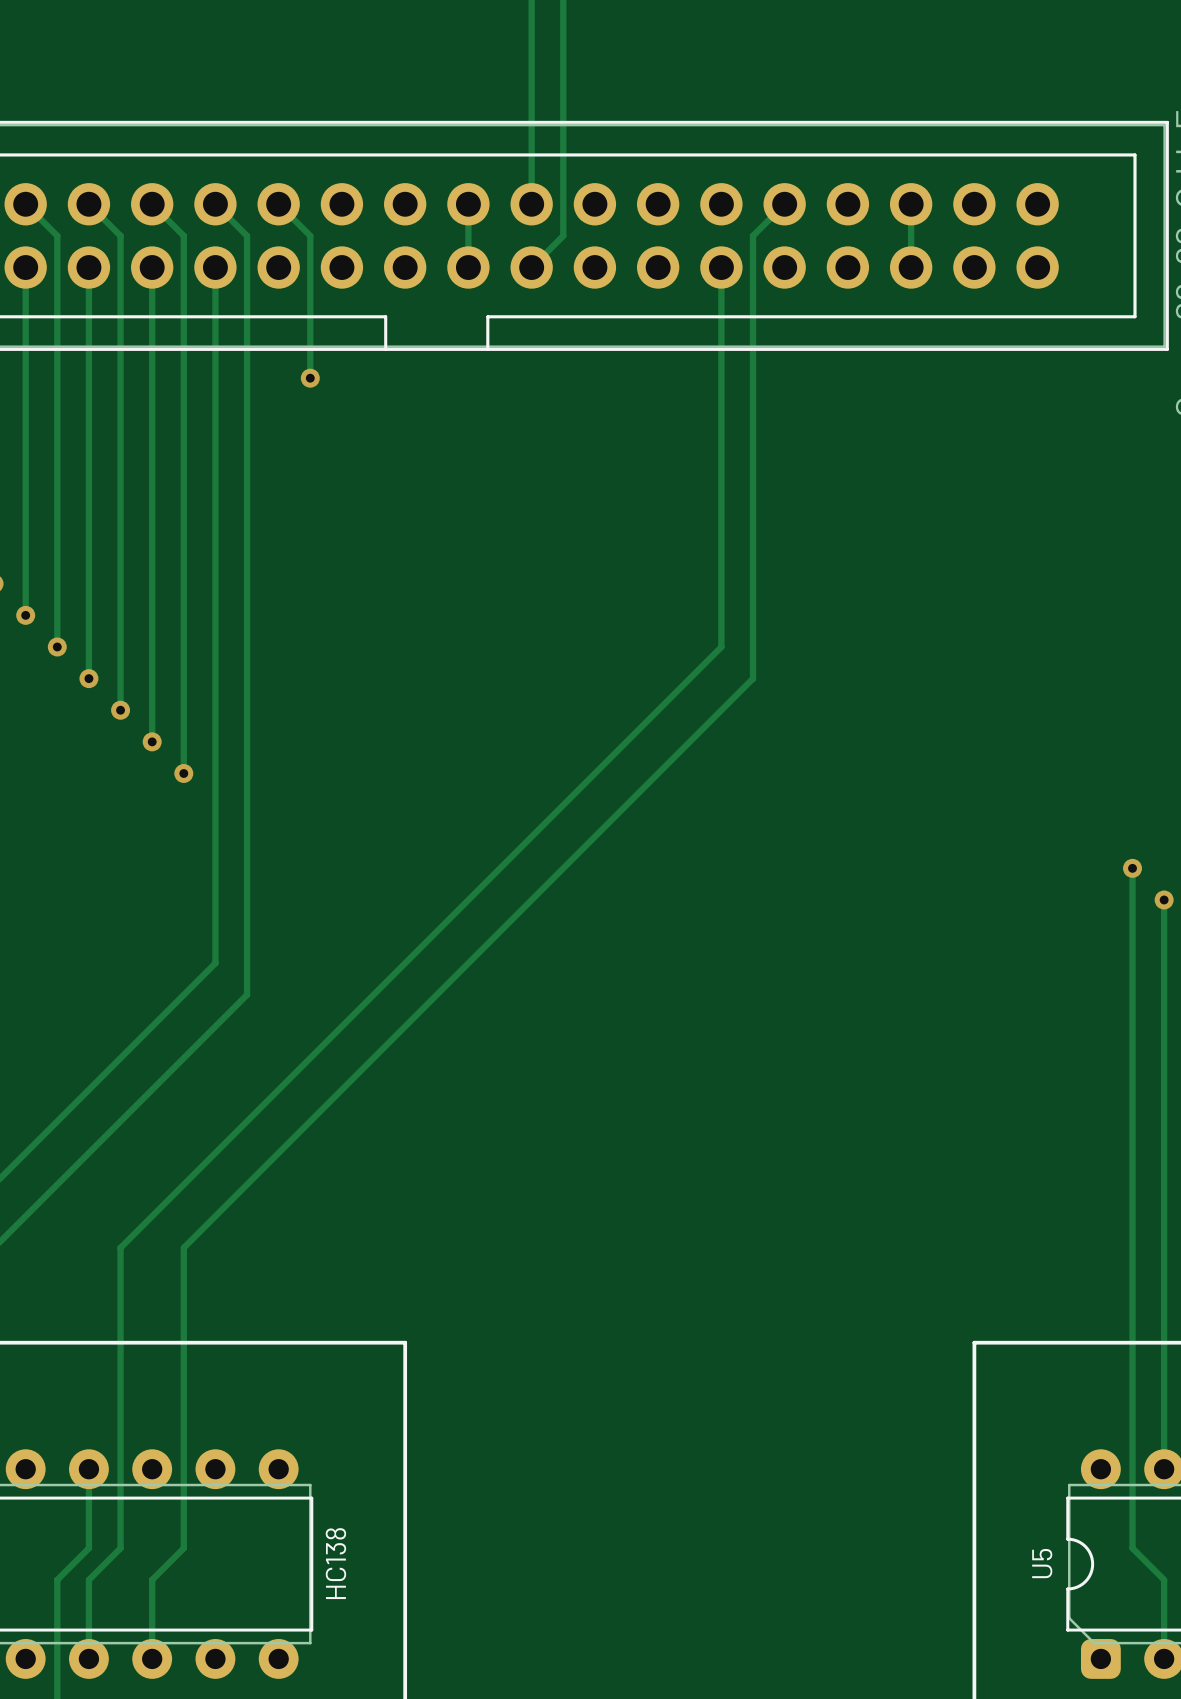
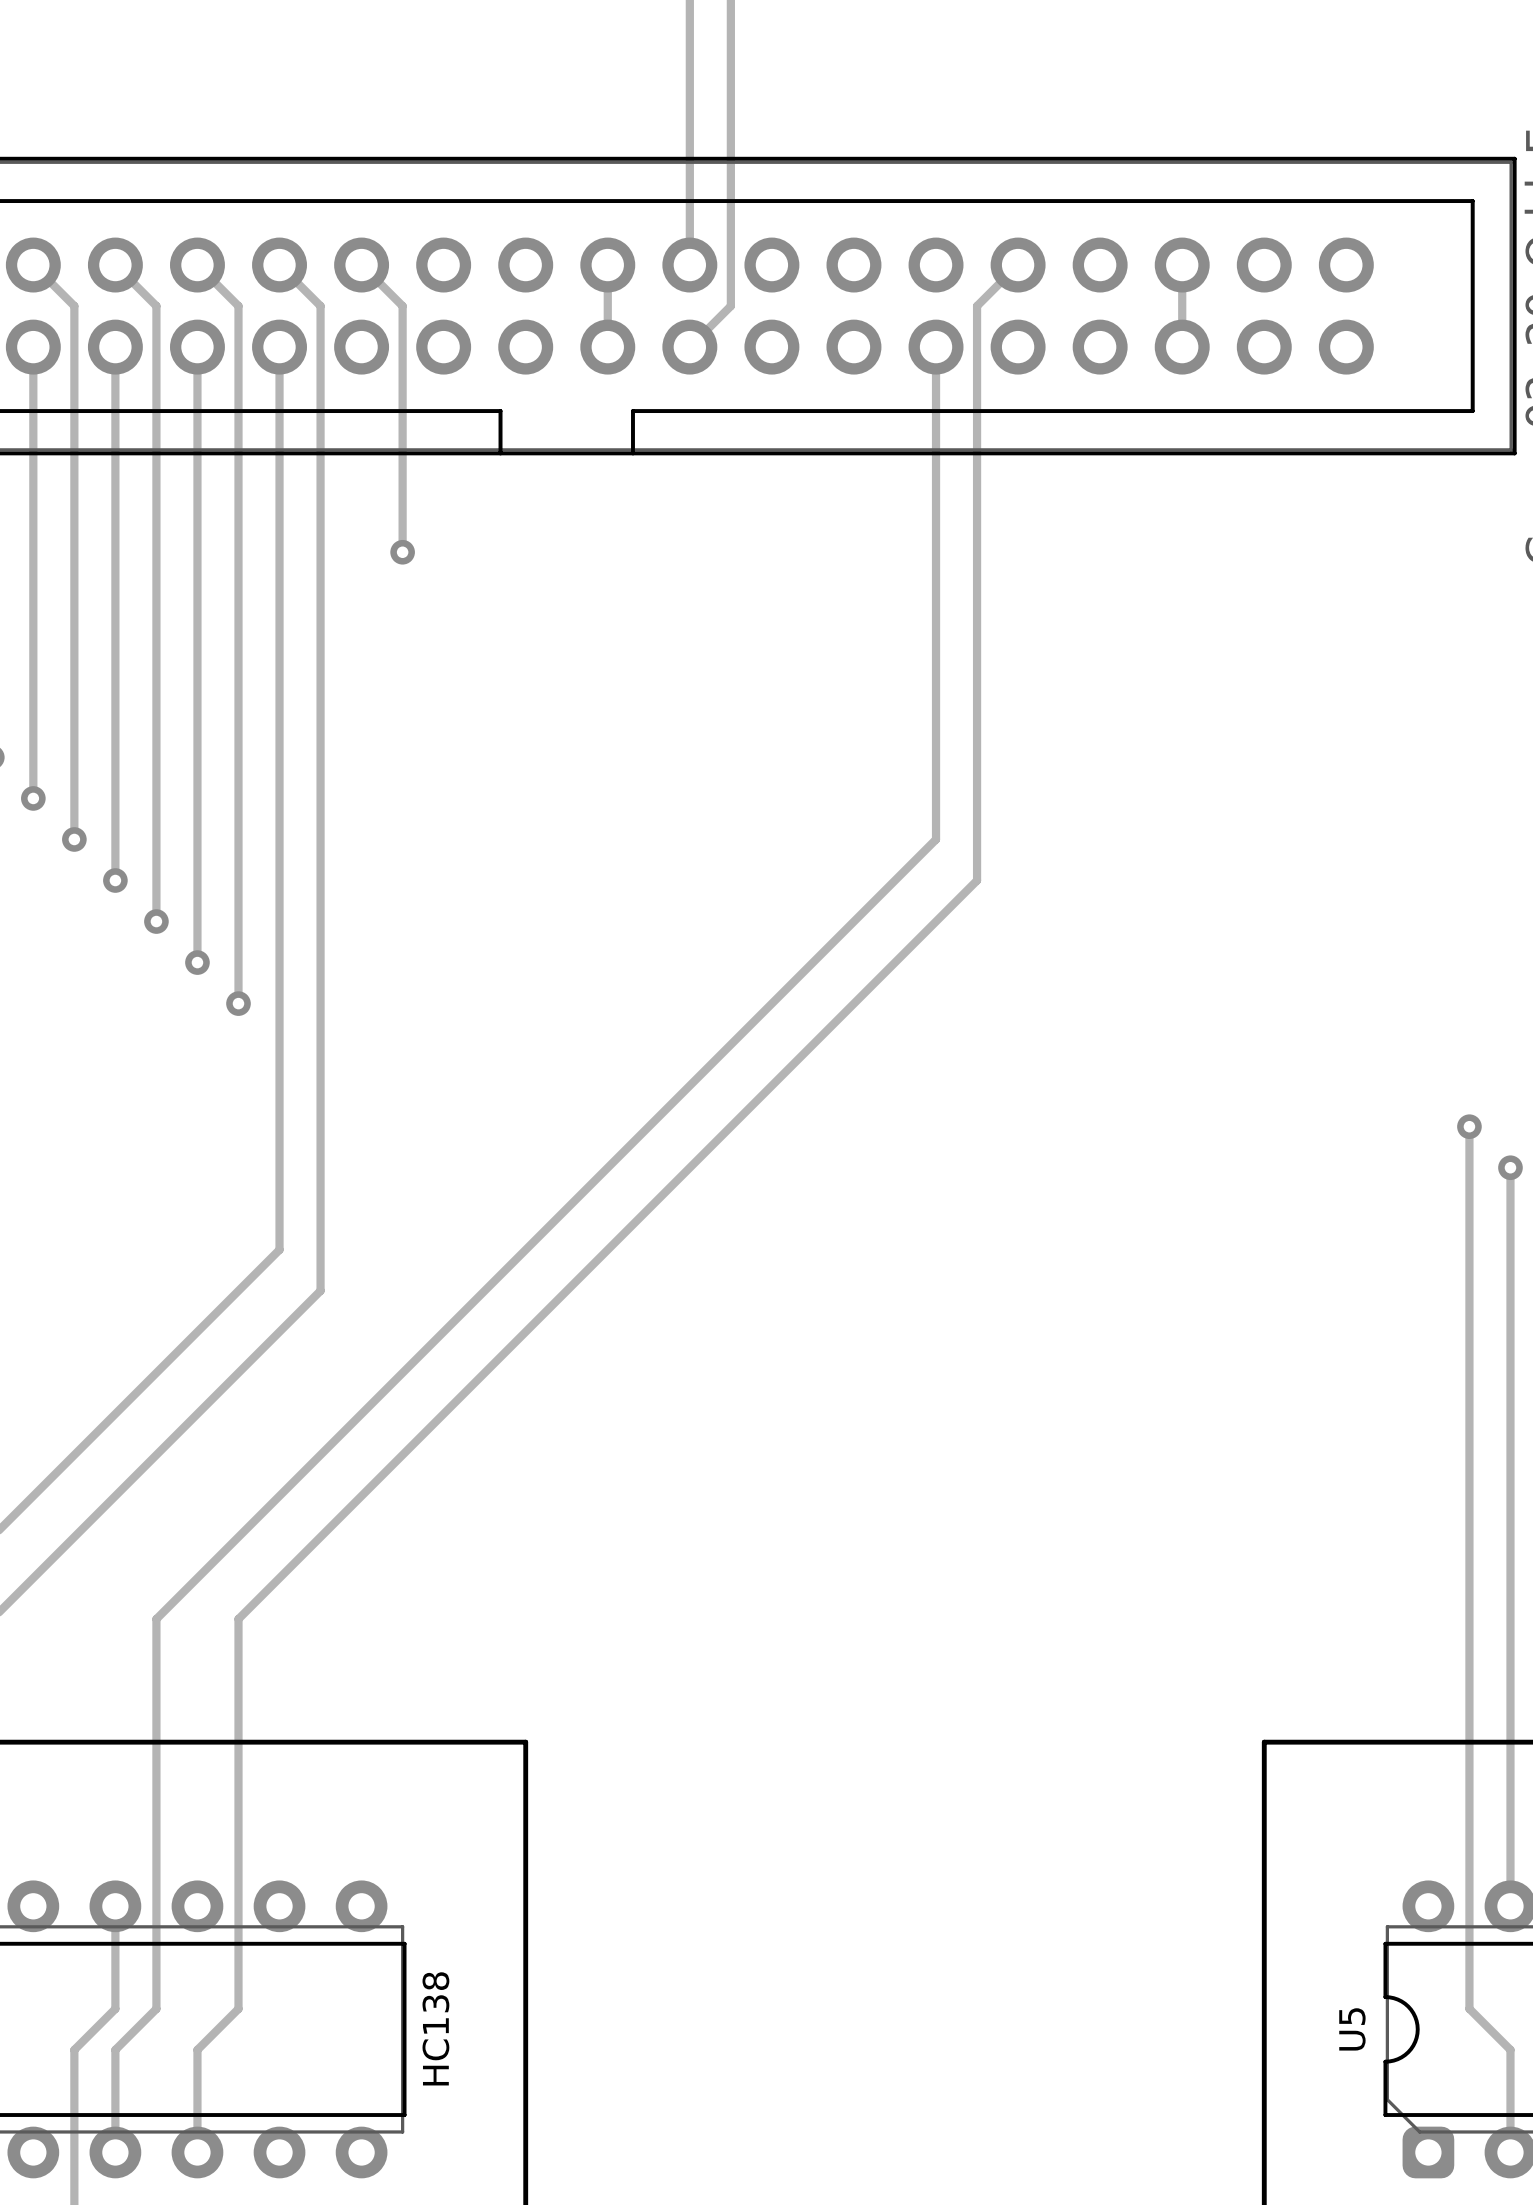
track: none -> (402, 490) (402, 552)
via position: (310, 378) -> (402, 552)

